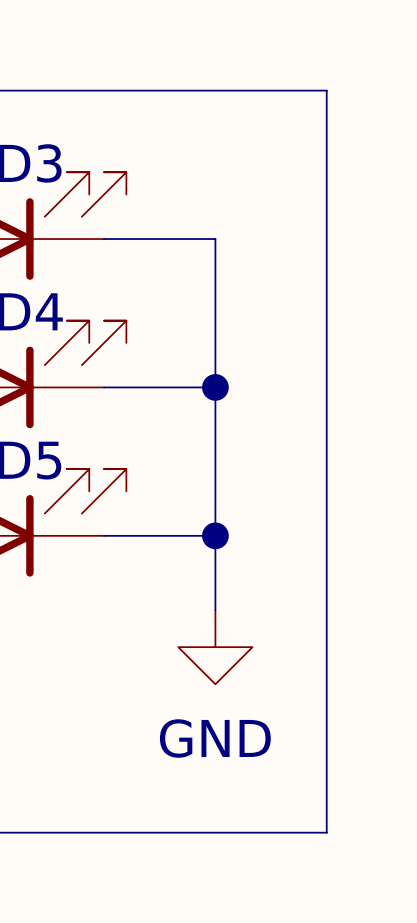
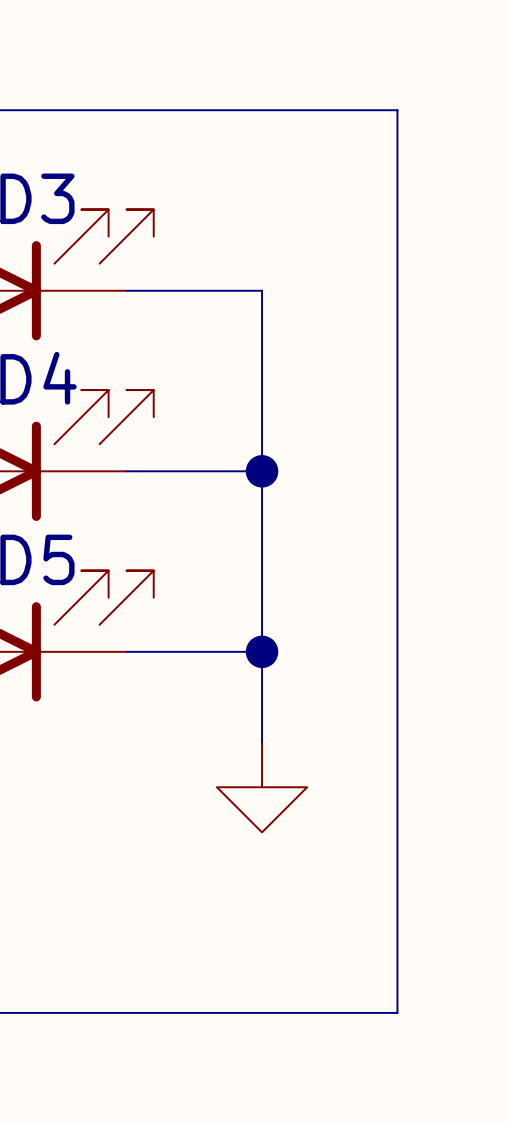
power symbol text: GND (215, 738) -> none

